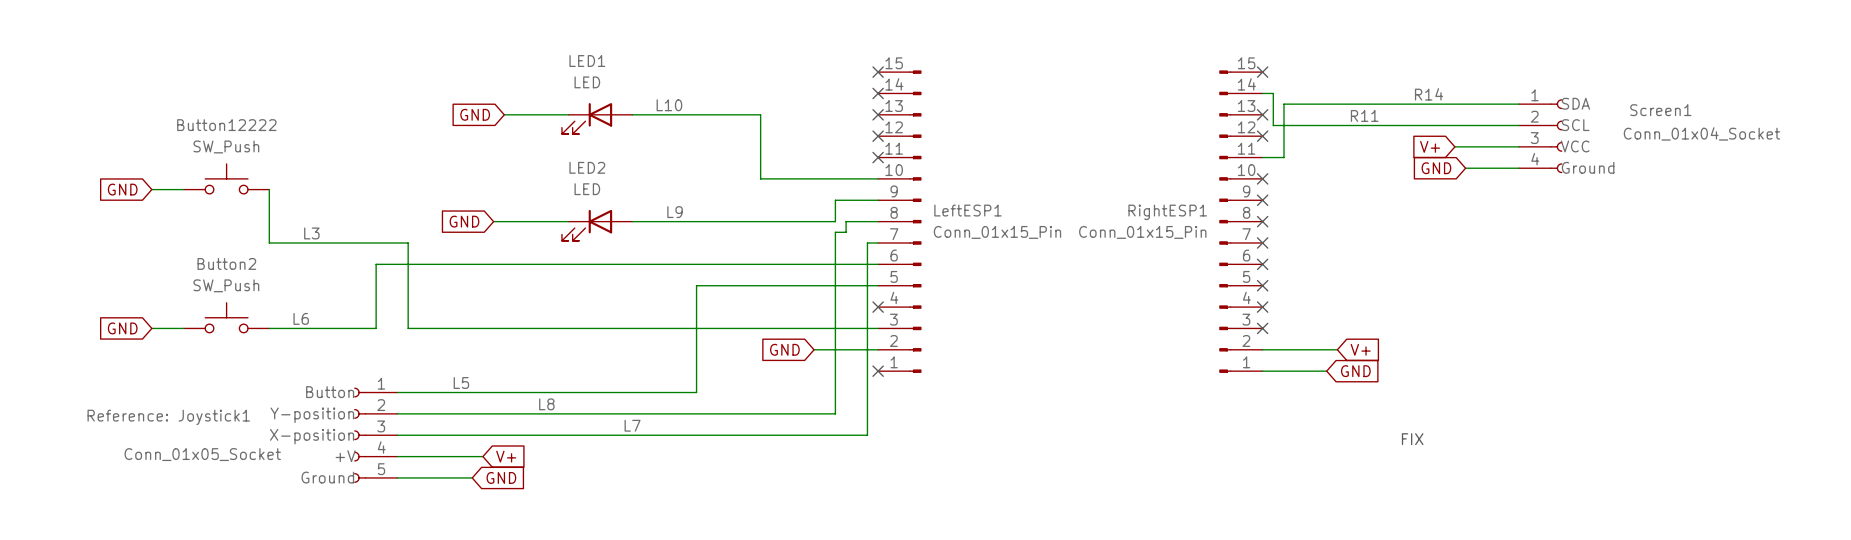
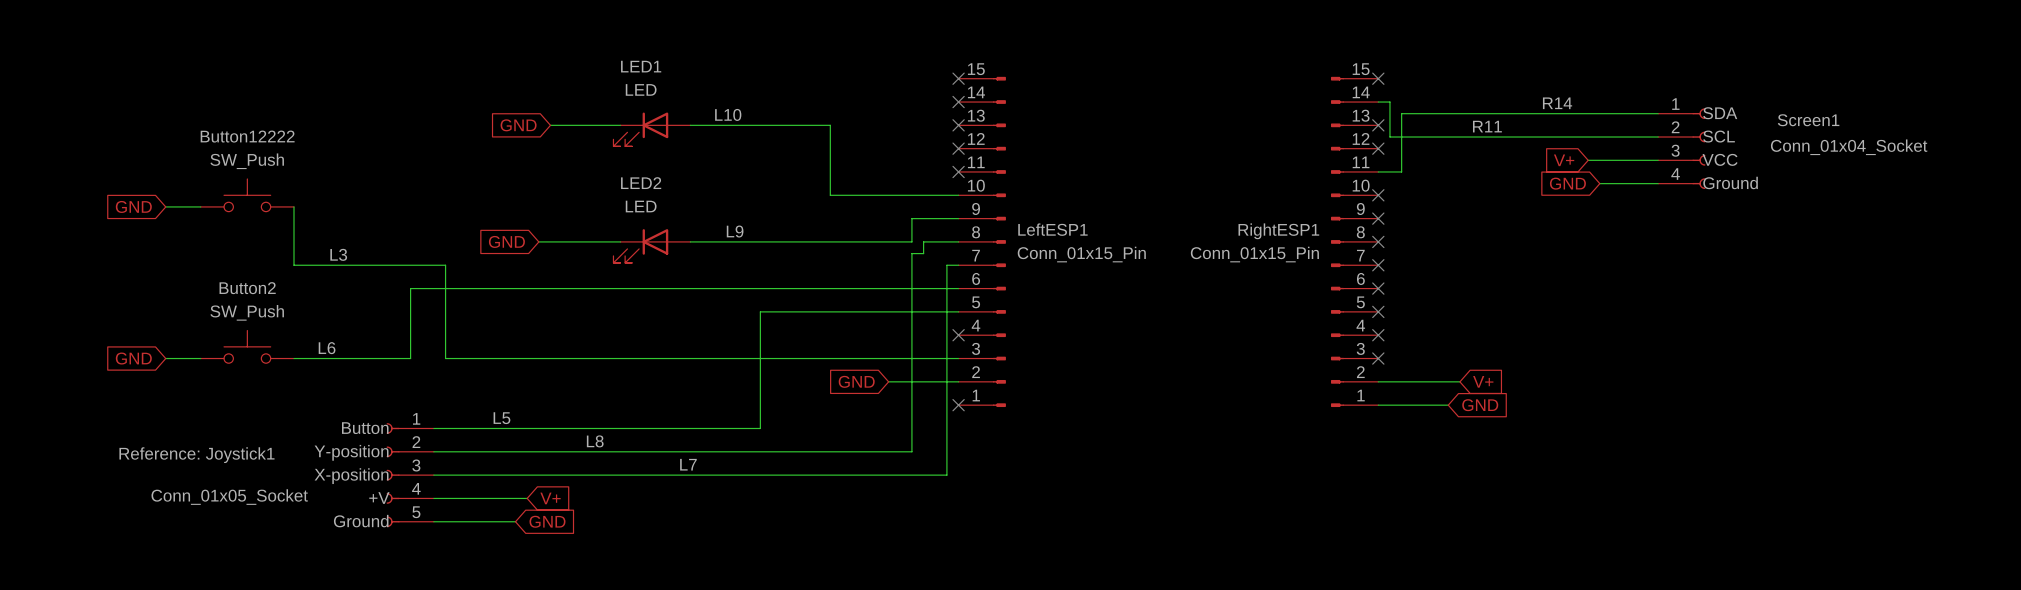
text: FIX (1412, 439) -> none

